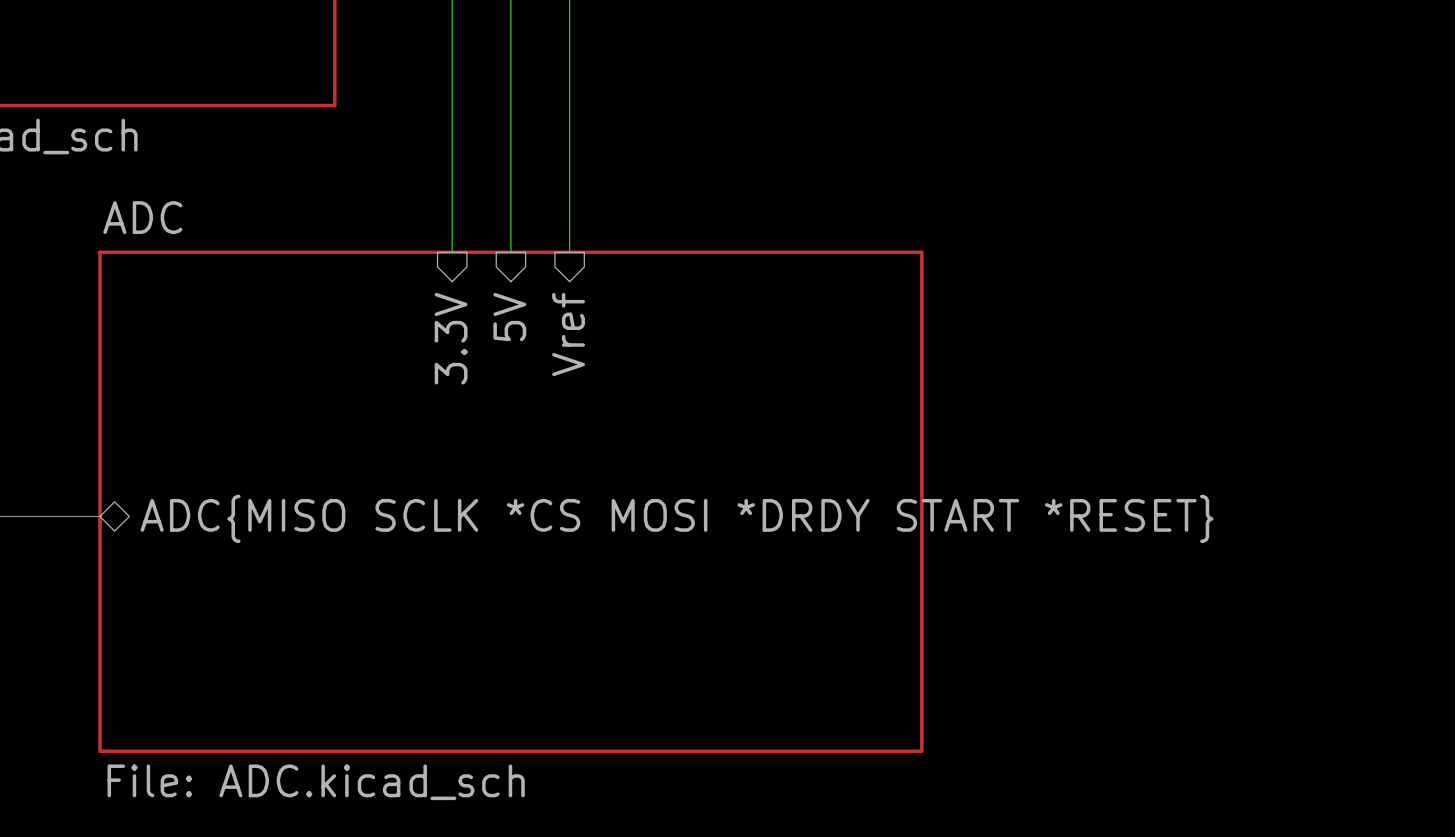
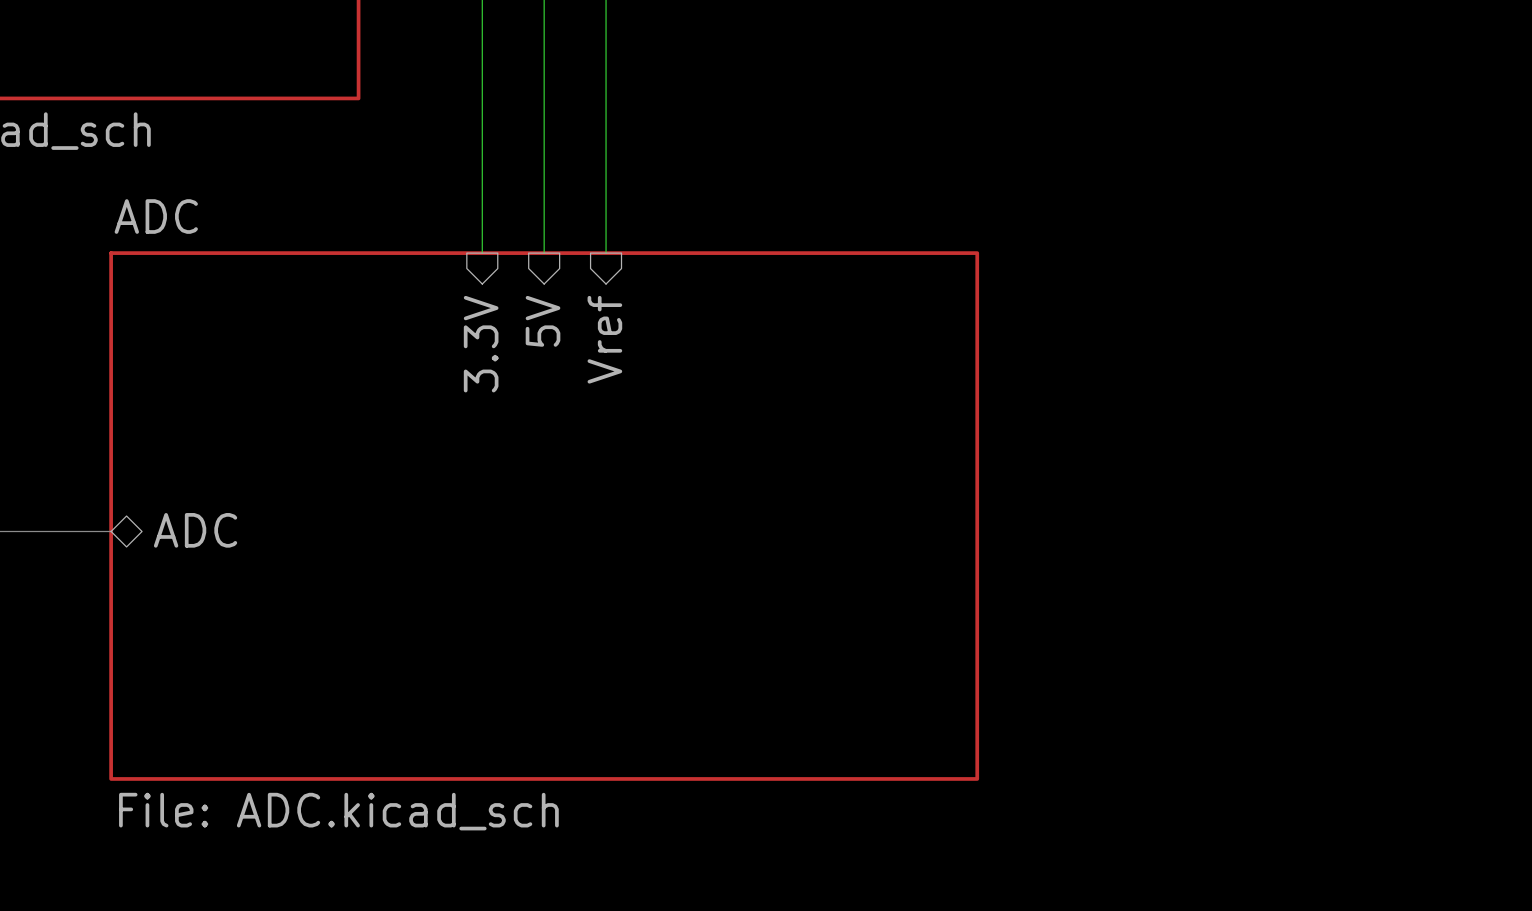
sheet pin: ADC{MISO SCLK *CS MOSI *DRDY START *RESET} (677, 518) -> ADC (195, 530)

